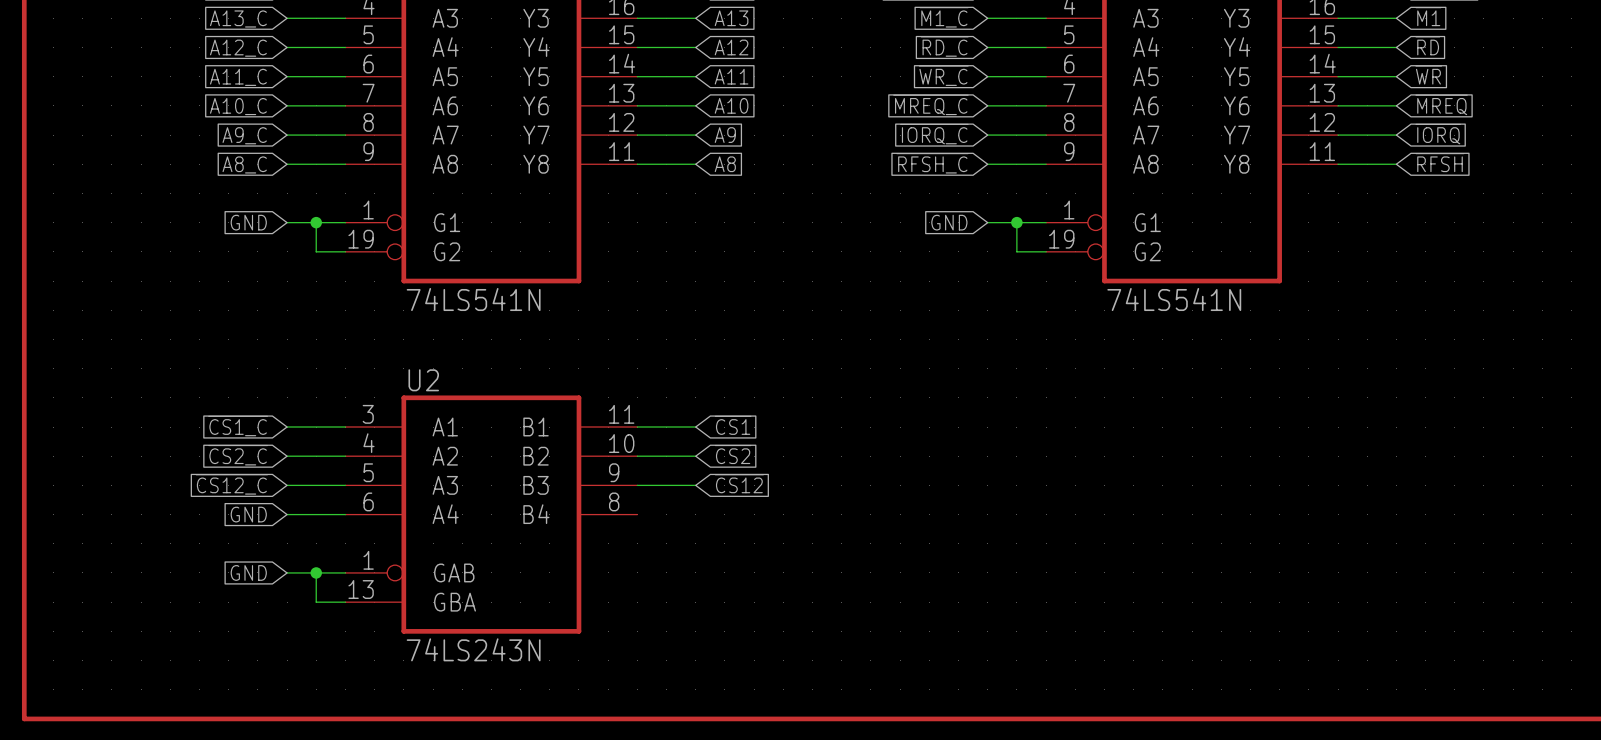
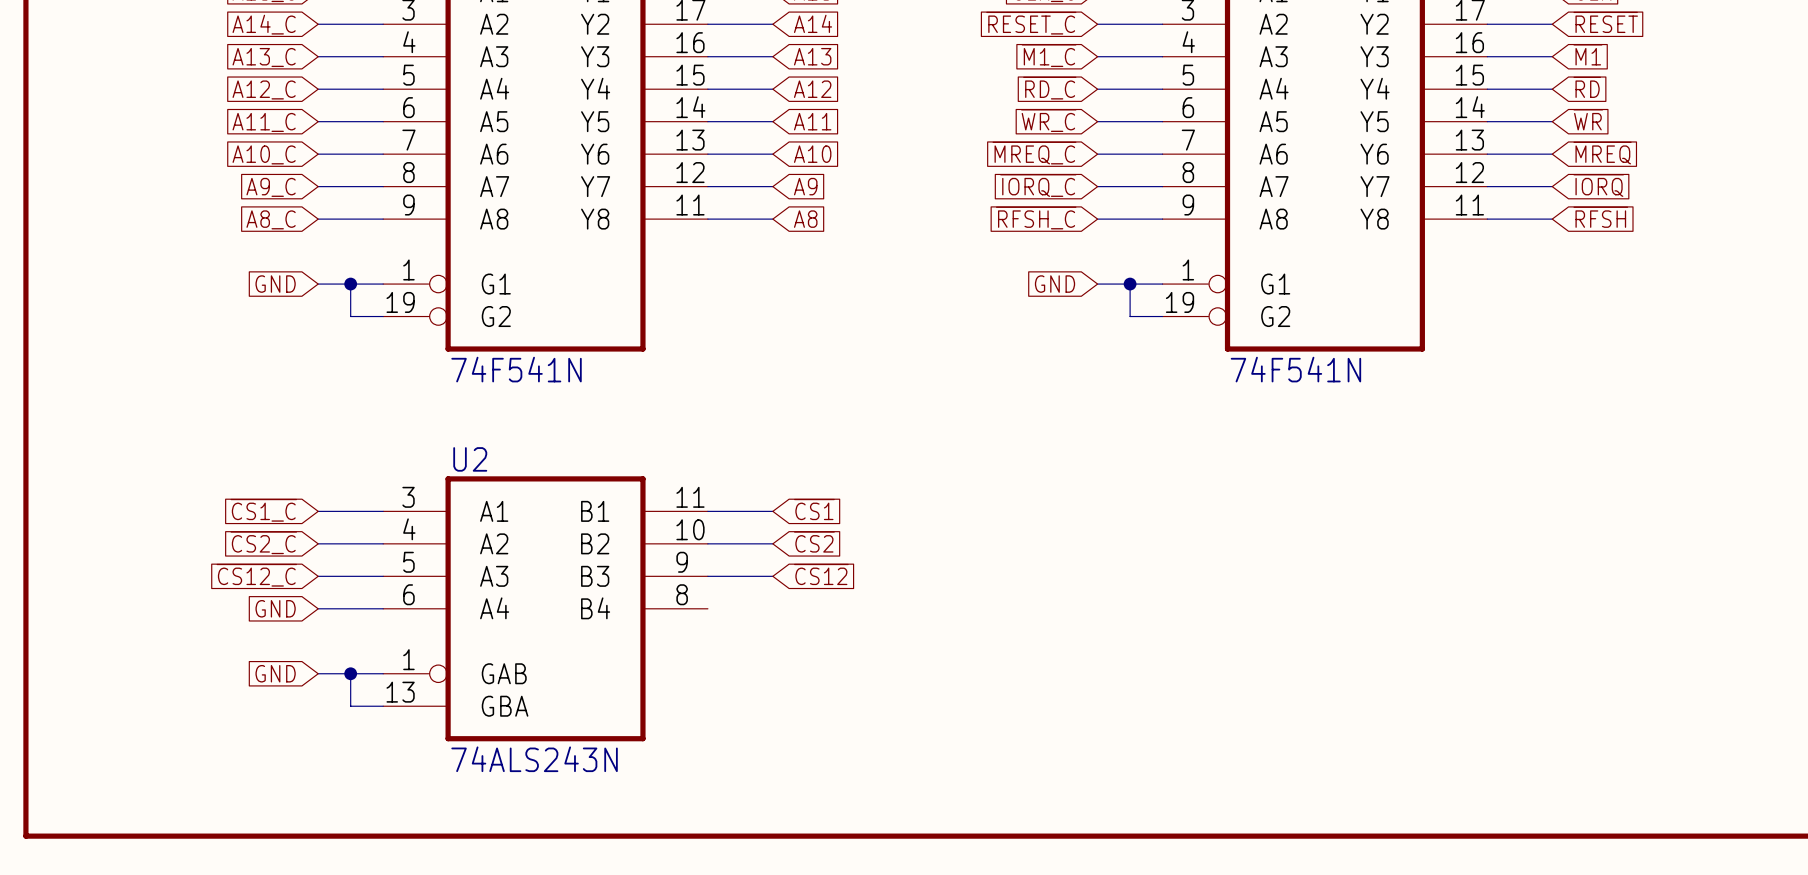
part value: 74LS541N (473, 299) -> 74F541N (516, 369)
part value: 74LS541N (1174, 299) -> 74F541N (1295, 369)
U2 value: 74LS243N (473, 649) -> 74ALS243N (534, 759)

